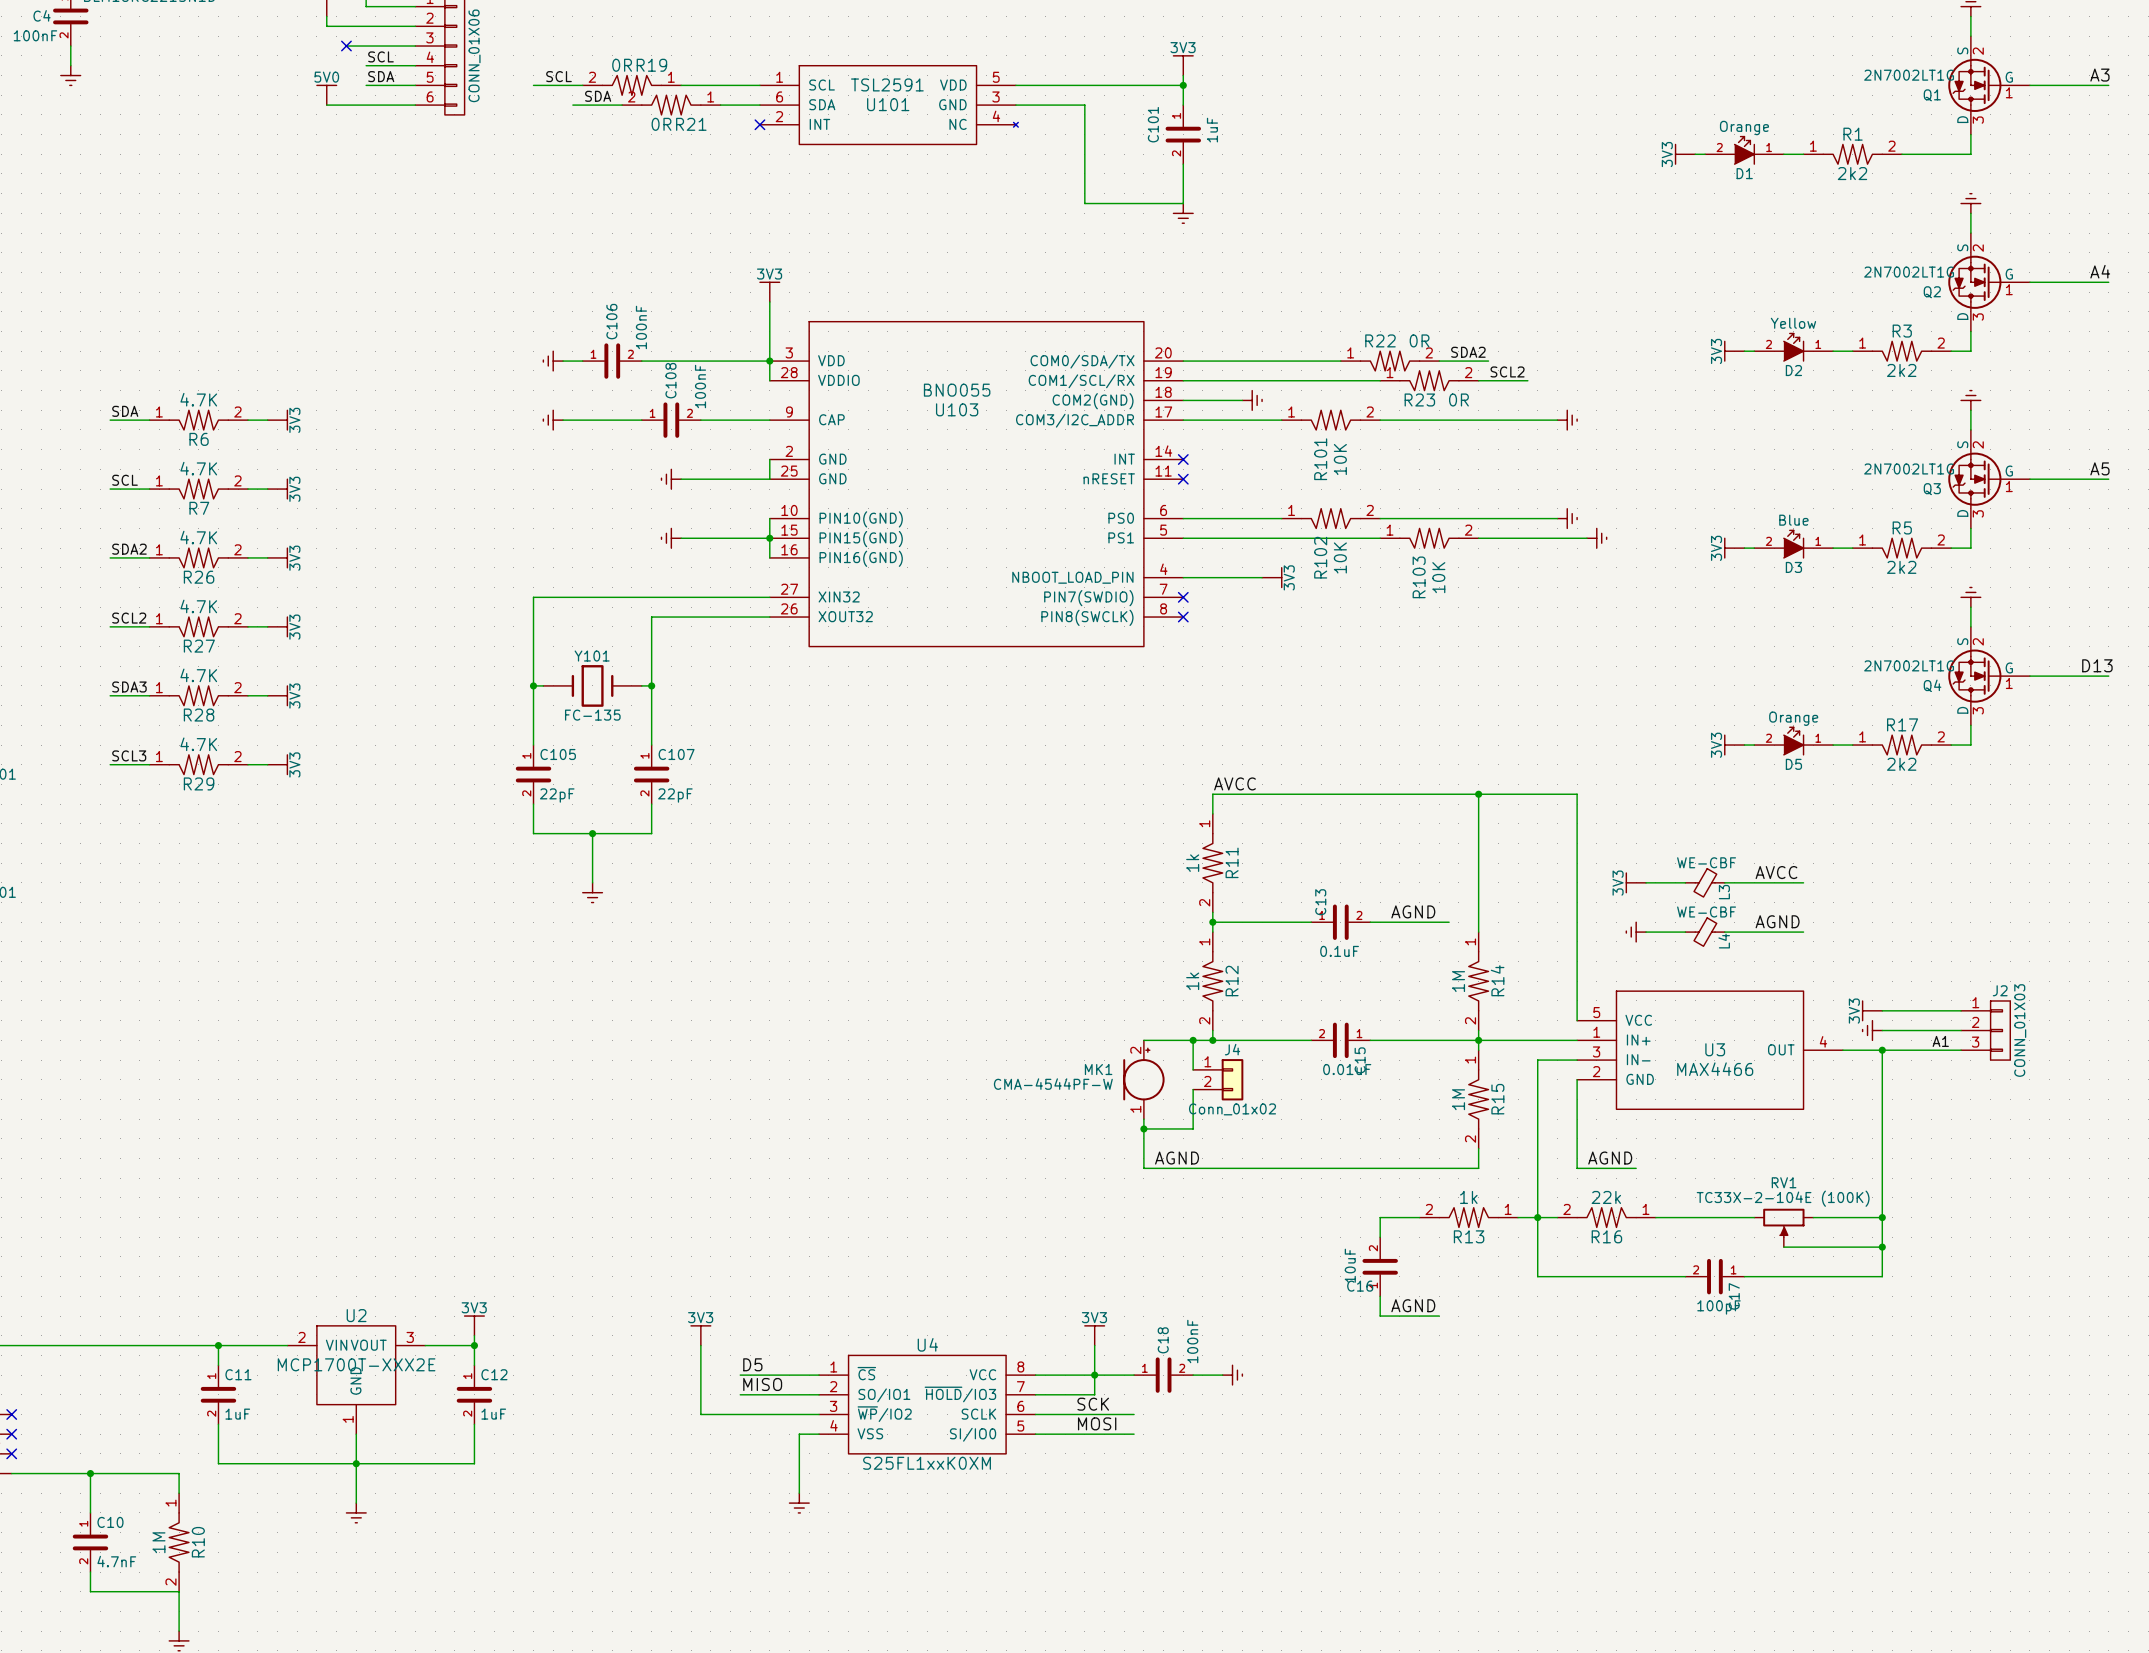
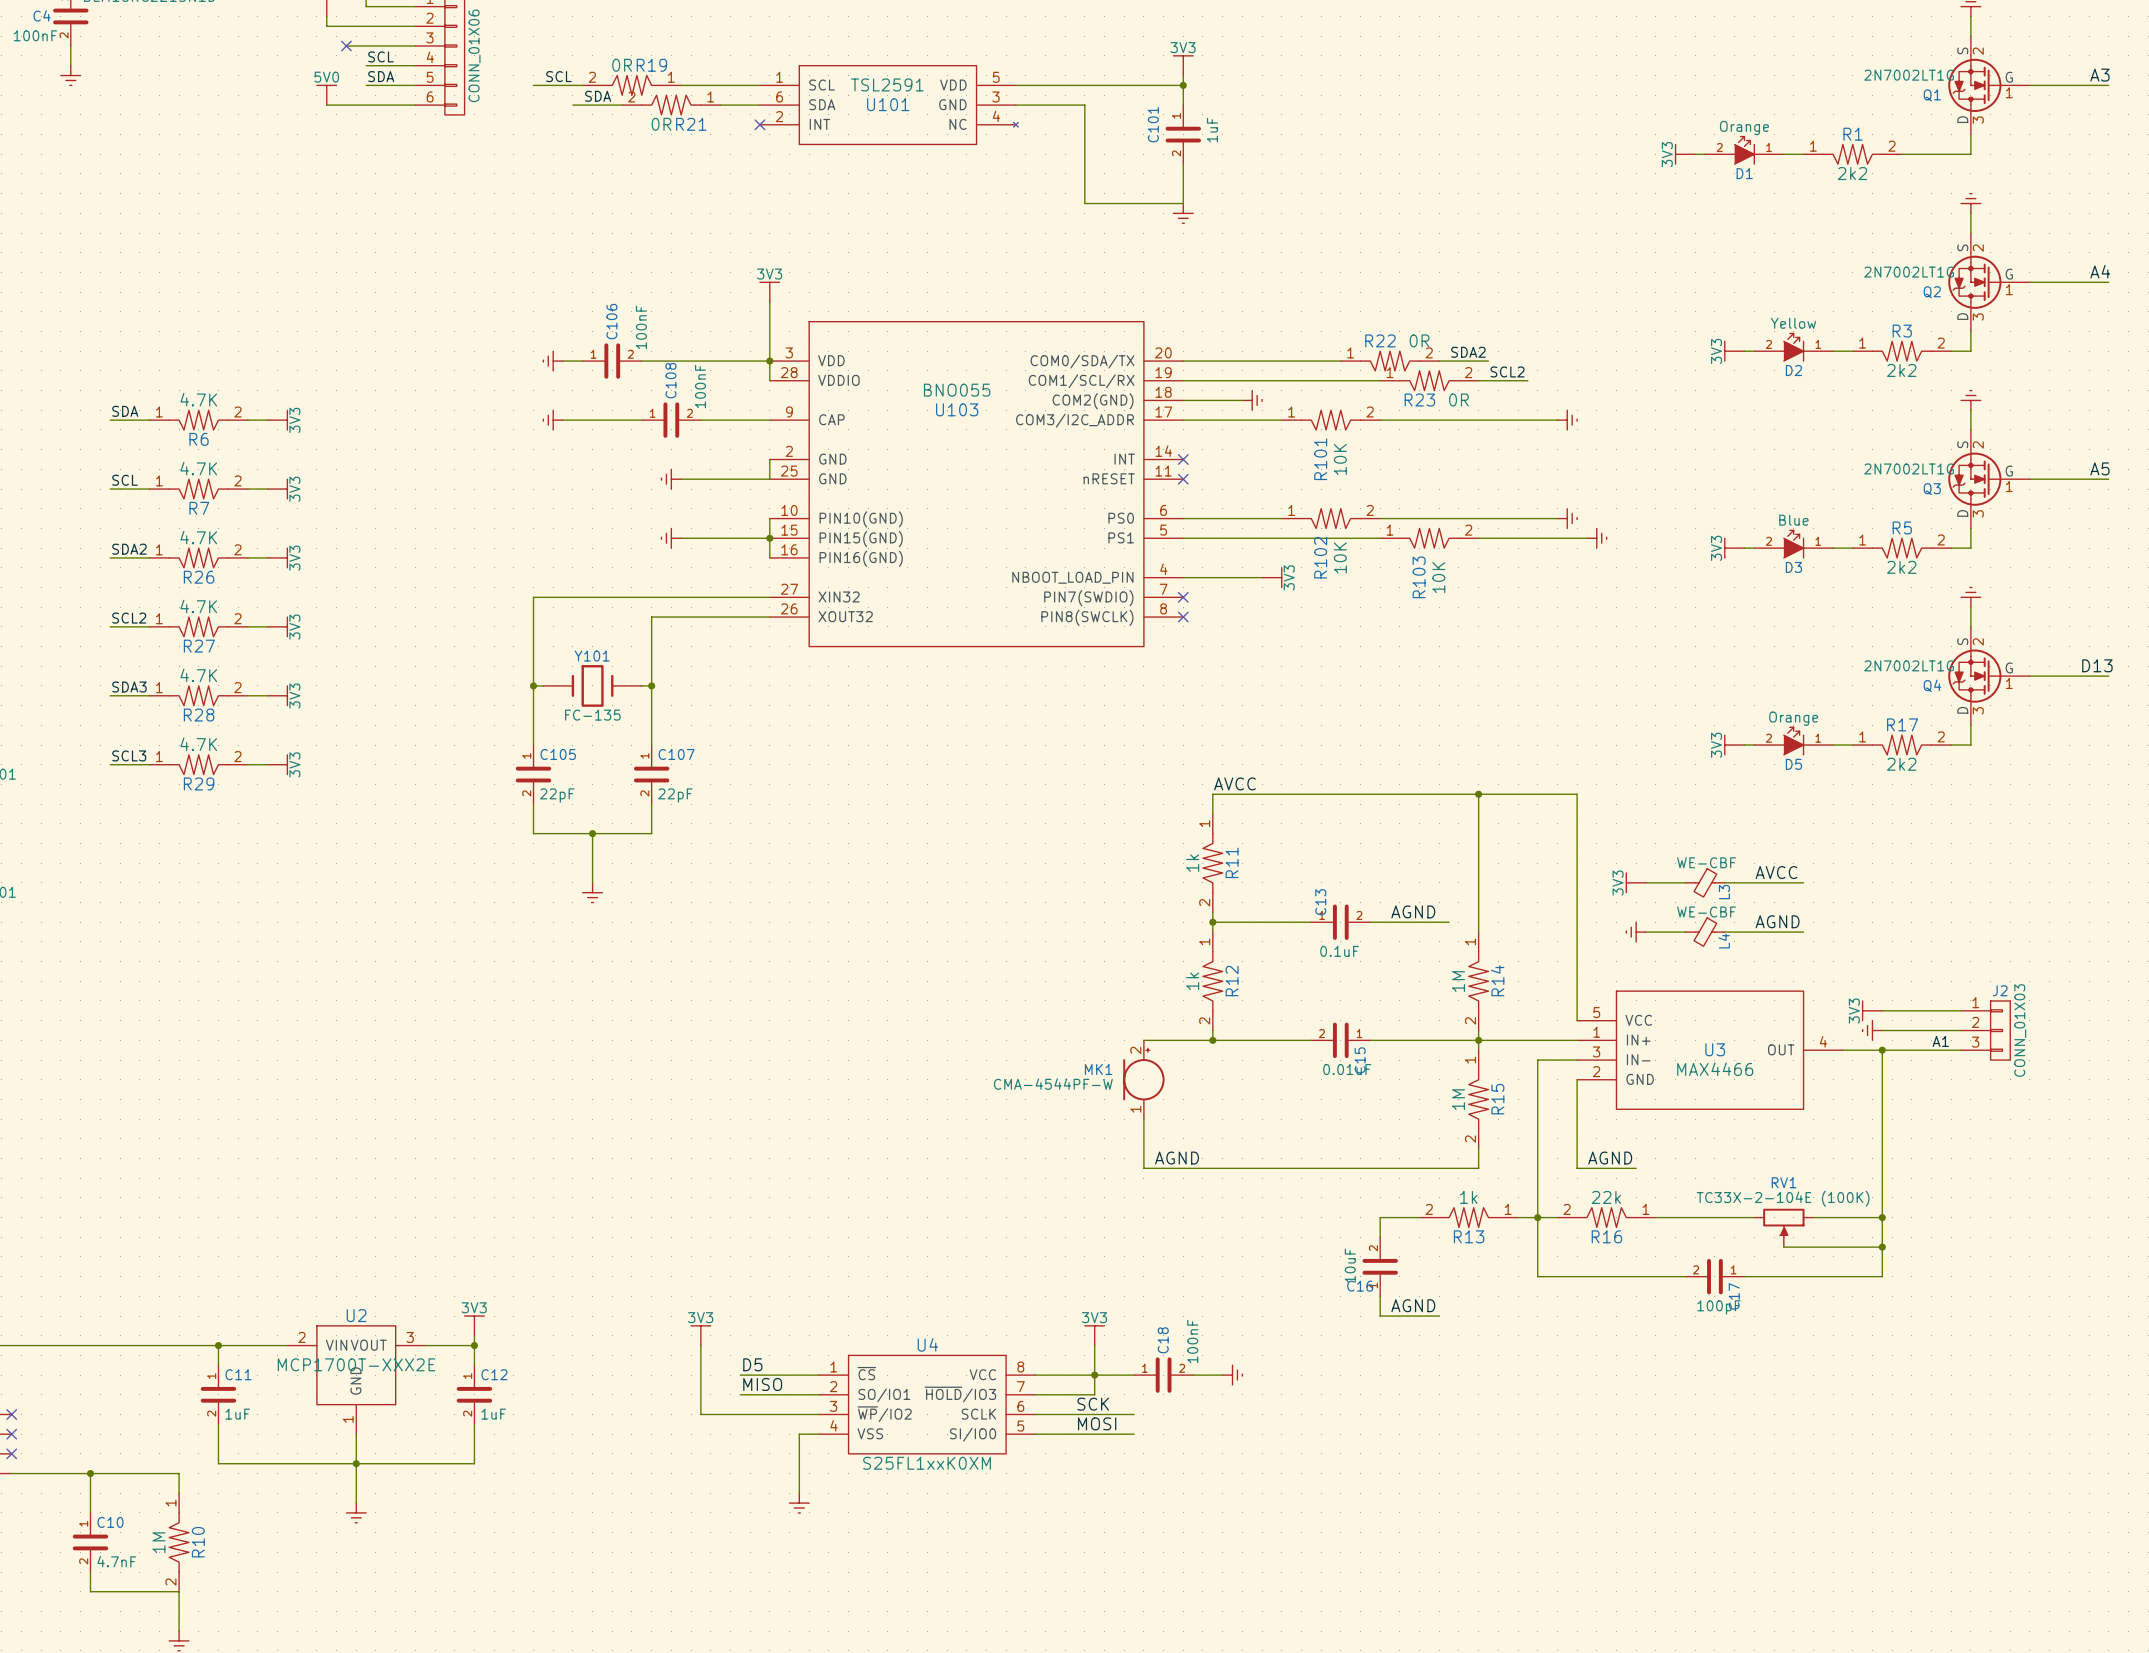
wire: (1193, 1040) (1193, 1069) -> none
junction: (1193, 1040) -> none
J4: Conn_01x02 (1218, 1079) -> none
wire: (1193, 1089) (1193, 1128) (1143, 1128) -> none
junction: (1143, 1128) -> none

